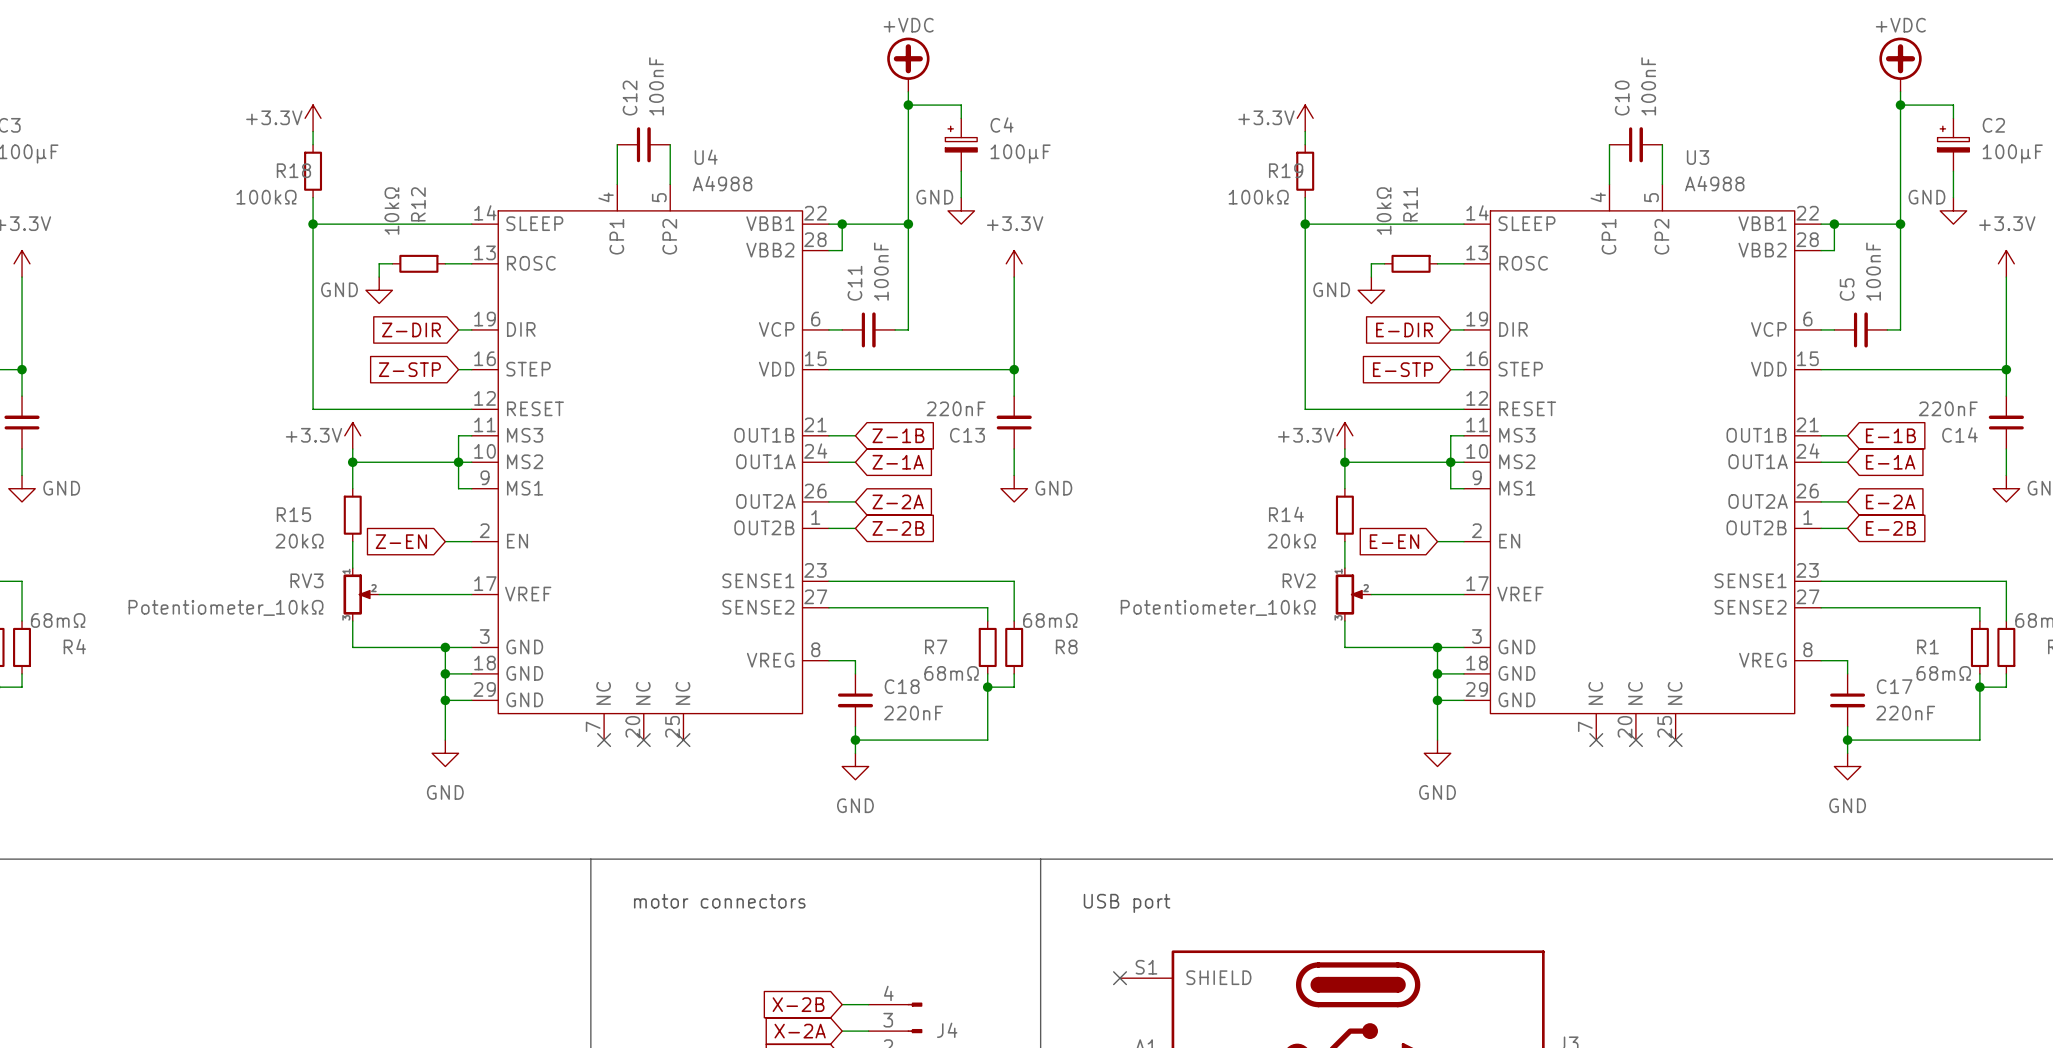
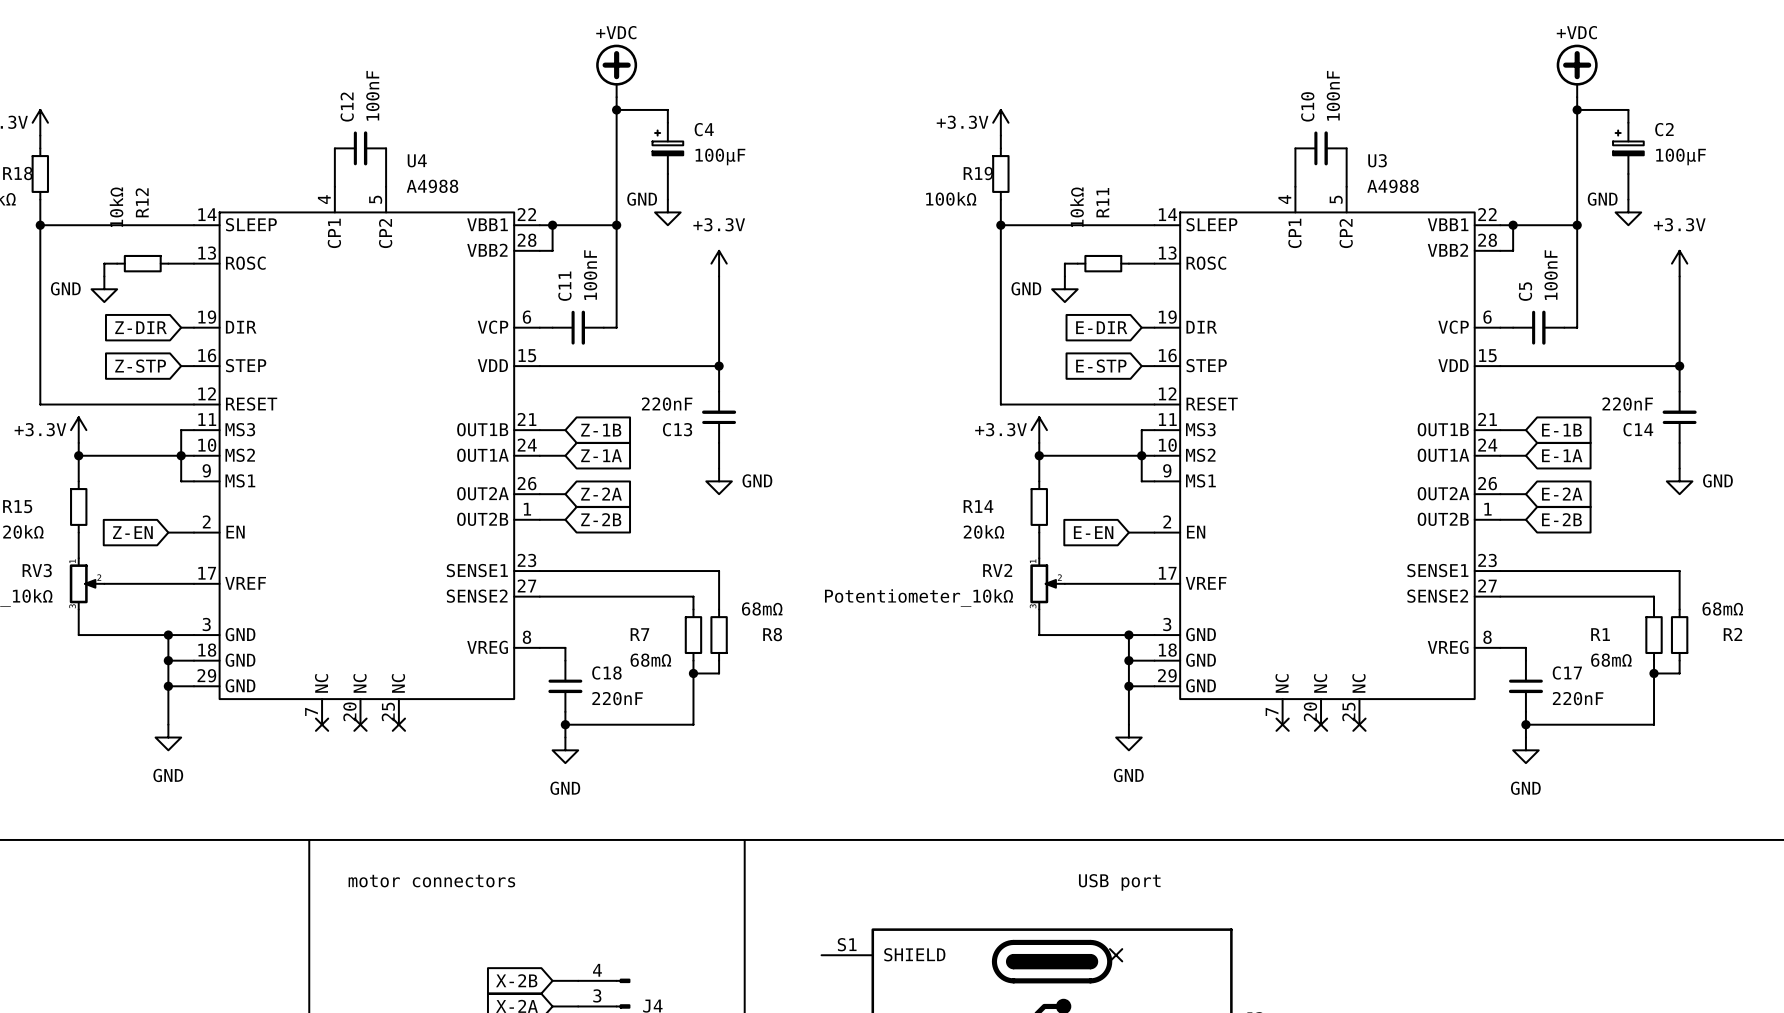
text: USB port (1127, 903) -> none
text: none -> USB port (1119, 882)
no-connect mark: (1120, 978) -> none
no-connect mark: none -> (1116, 955)

